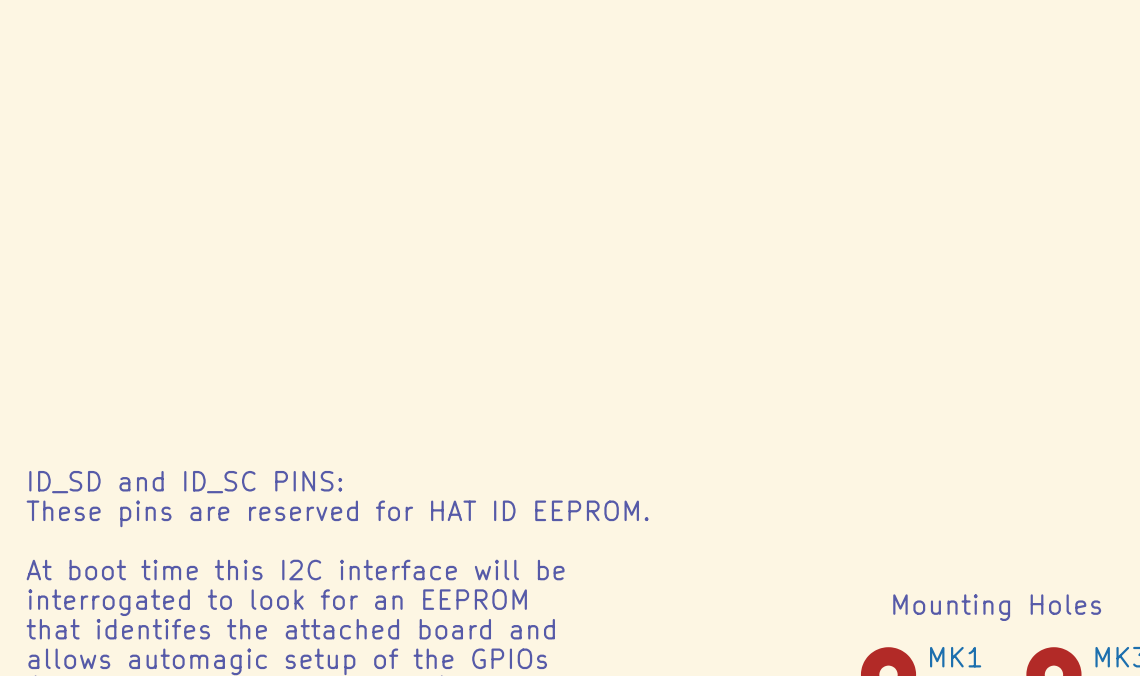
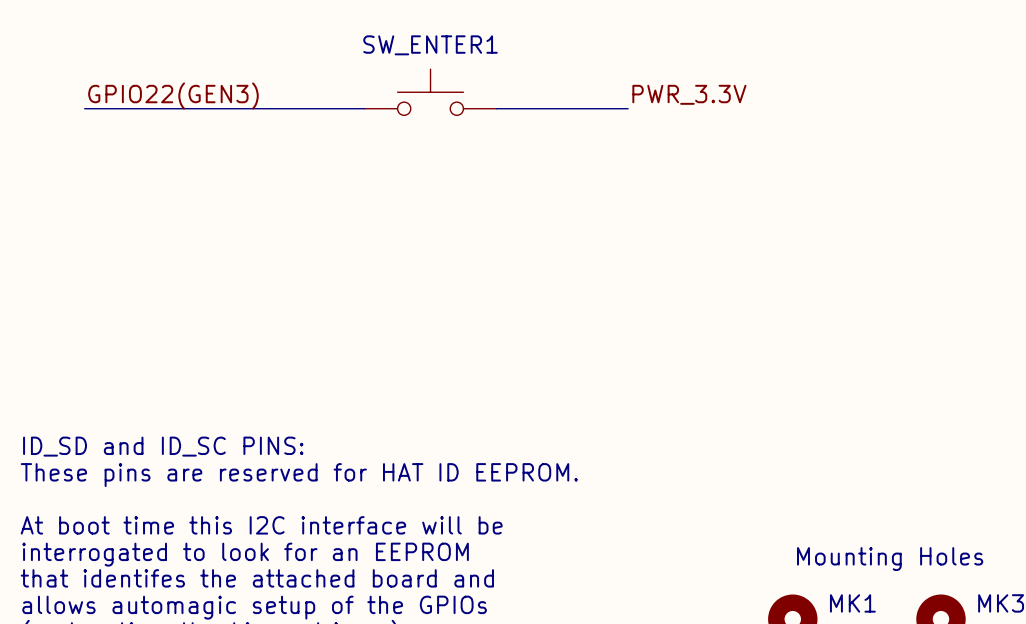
SW_ENTER1: none -> (430, 92)
label: none -> PWR_3.3V (689, 94)
label: none -> GPIO22(GEN3) (173, 95)
wire: none -> (84, 108) (364, 108)
wire: none -> (496, 108) (628, 108)

